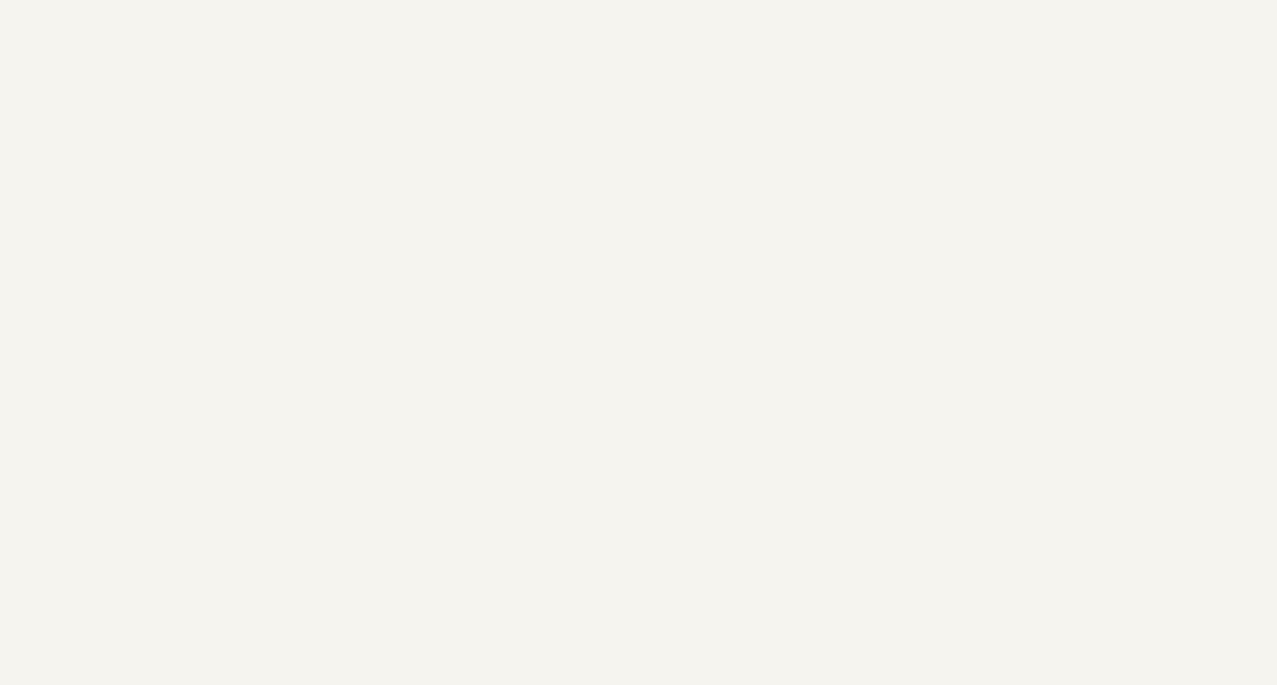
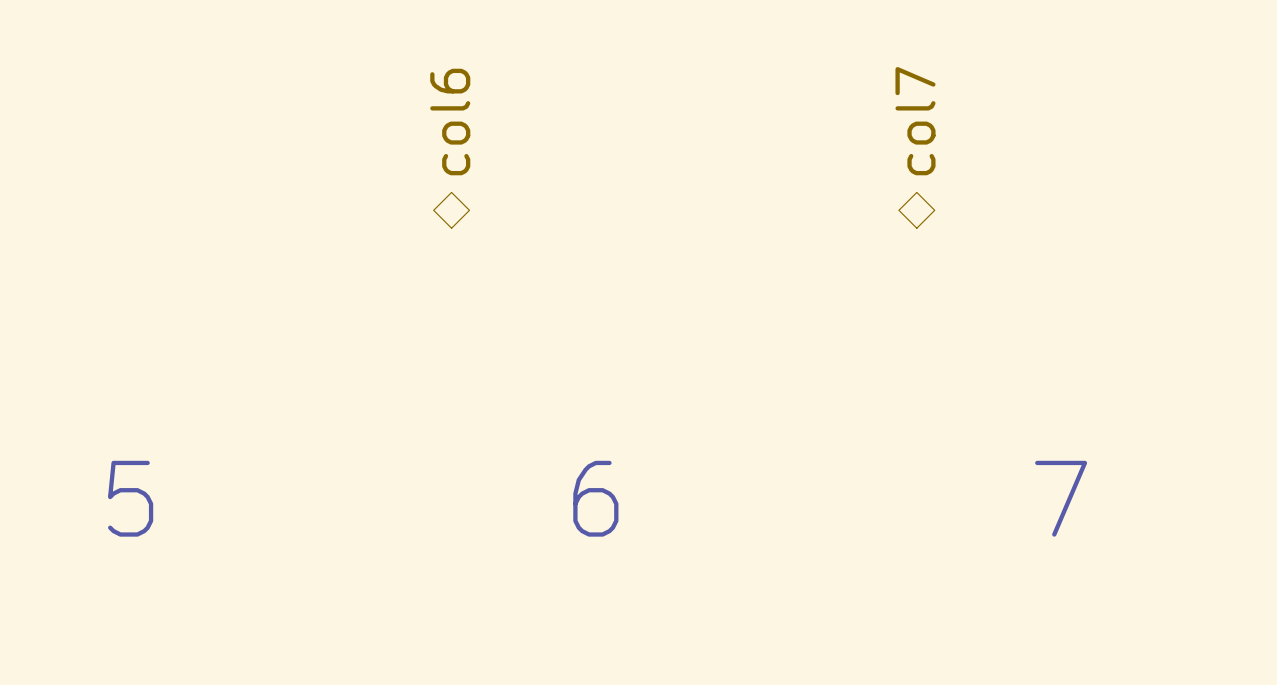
hierarchical label: none -> col6 (450, 122)
hierarchical label: none -> col7 (915, 121)
text: none -> 6 (595, 498)
text: none -> 7 (1061, 498)
text: none -> 5 (130, 498)

